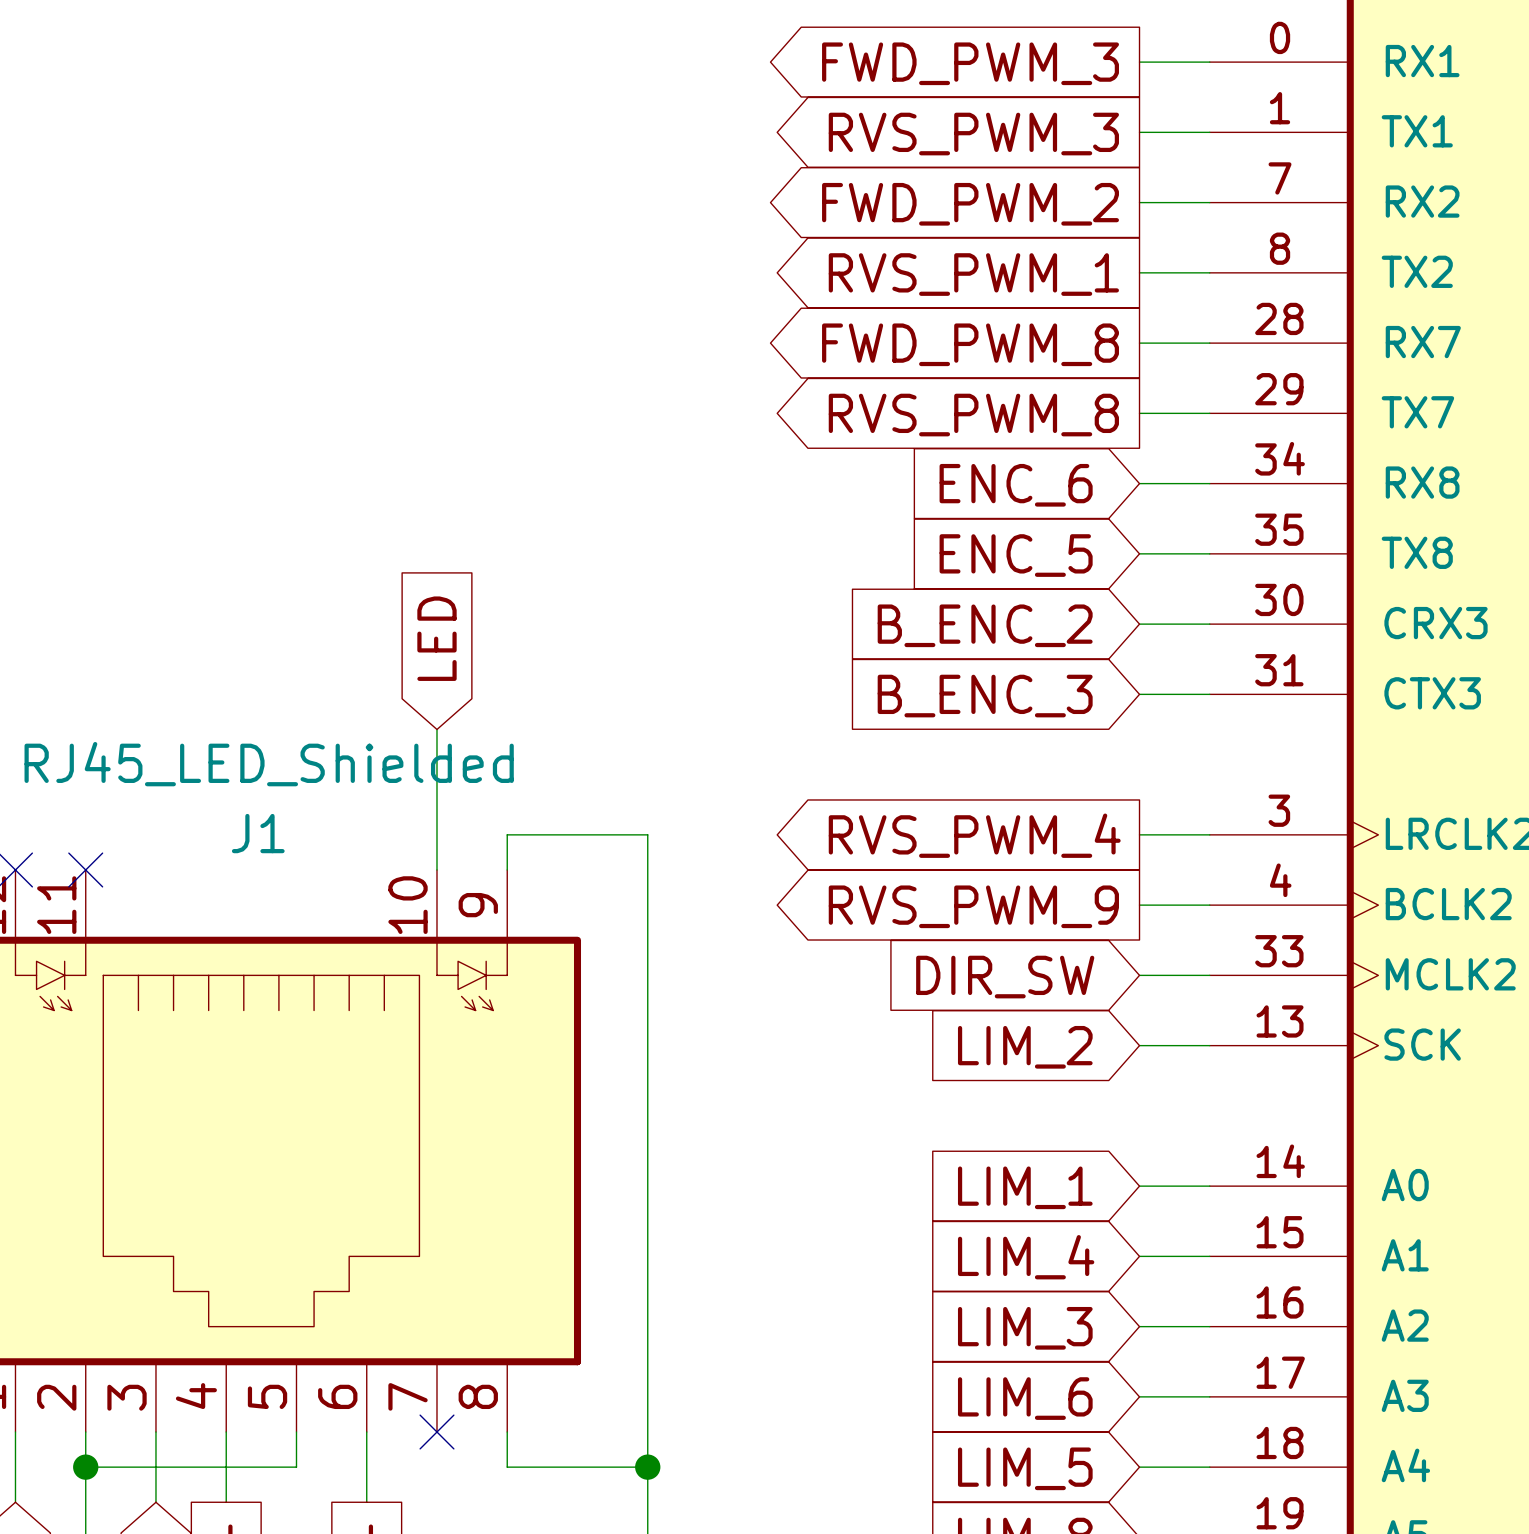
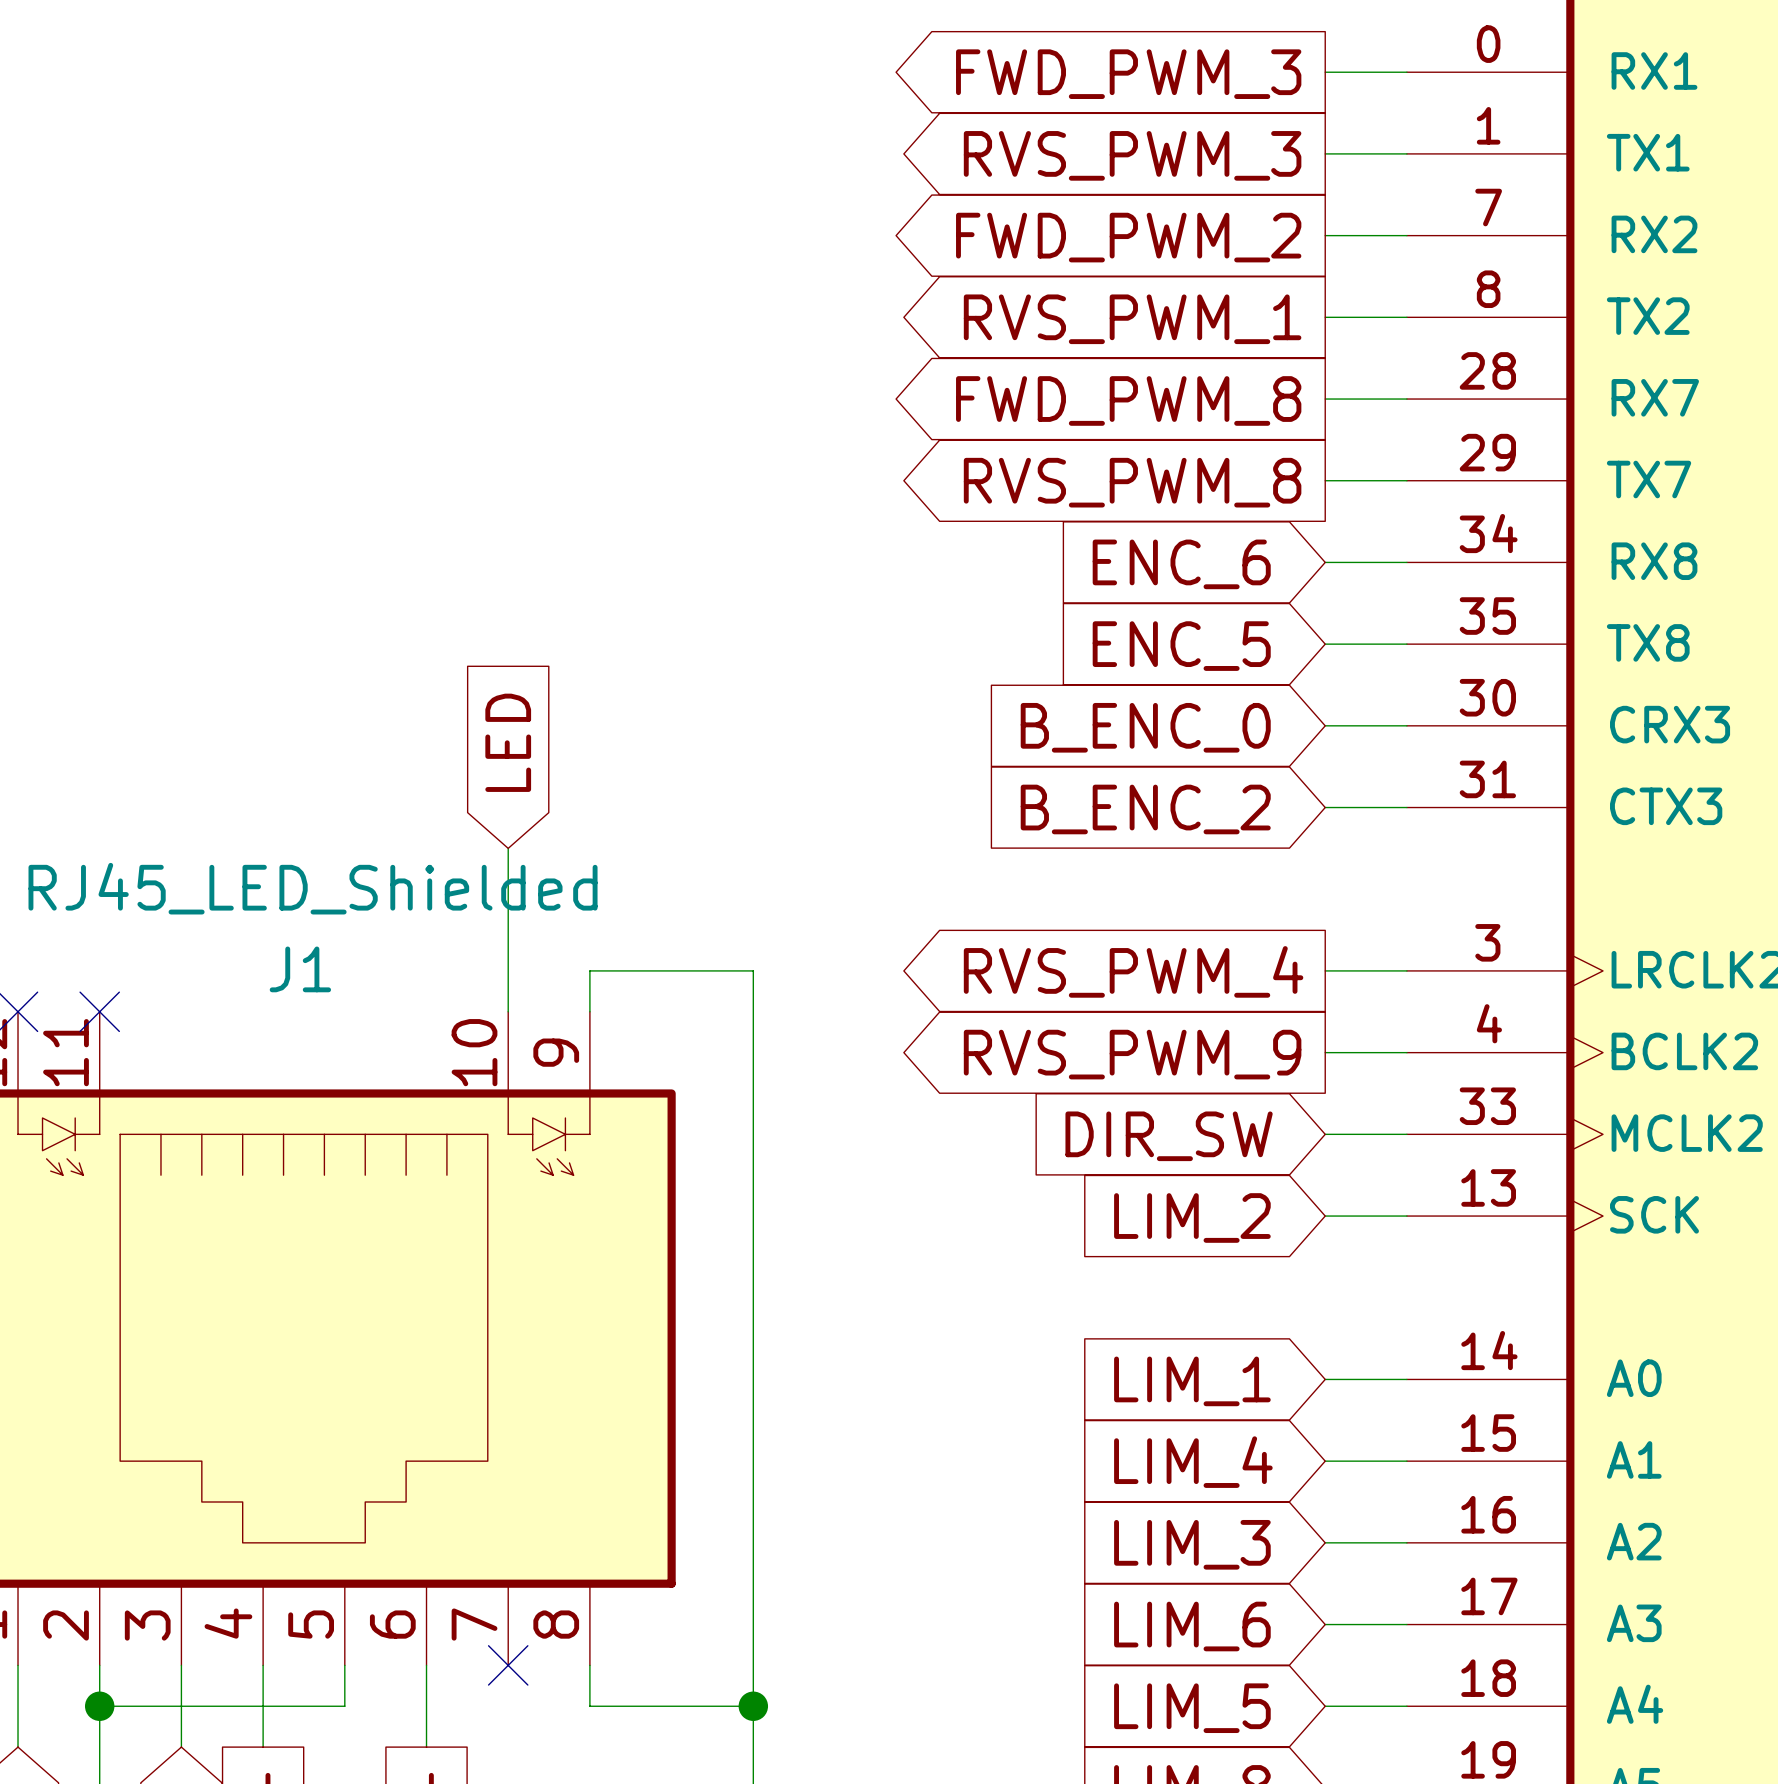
global label: B_ENC_2 (985, 625) -> B_ENC_0 (1145, 727)
global label: B_ENC_3 (985, 696) -> B_ENC_2 (1145, 809)

